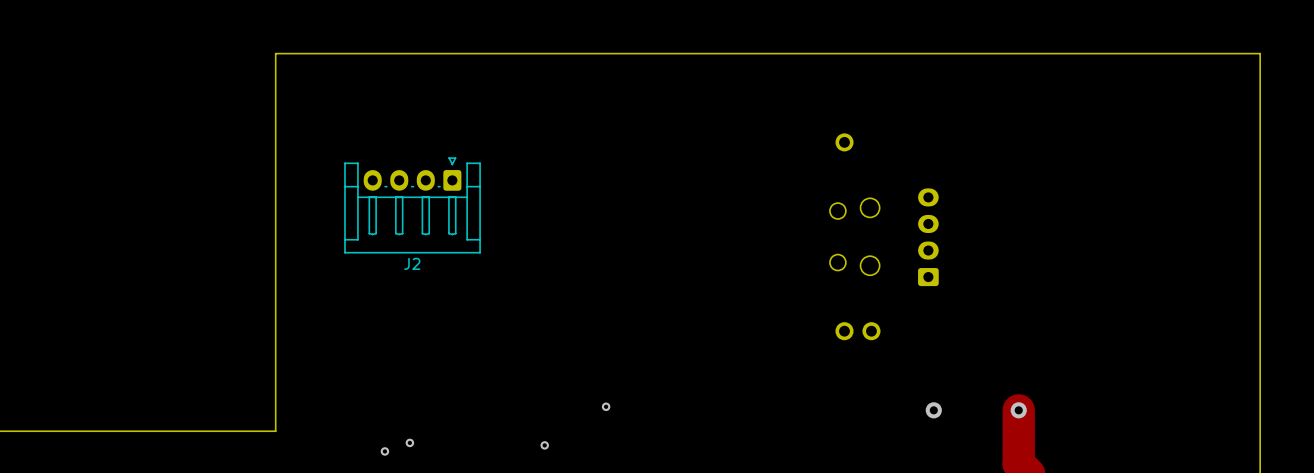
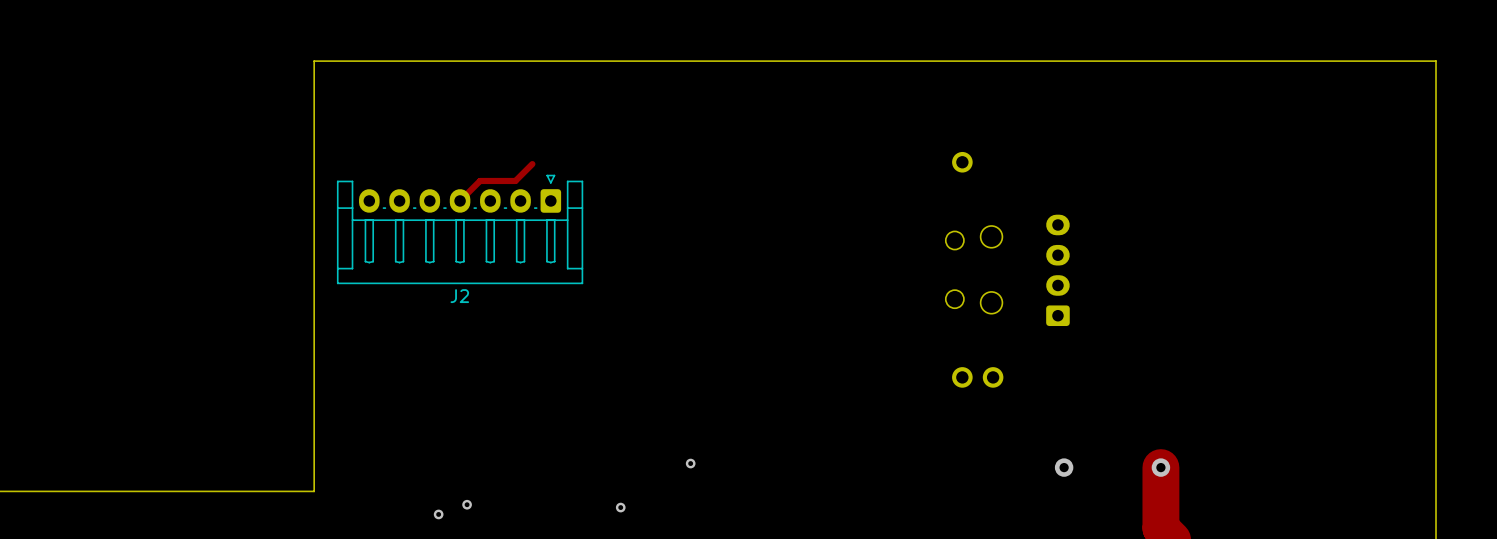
track: none -> (532, 164) (515, 180) (480, 180) (460, 200)
J2 footprint: [344, 157, 481, 254] -> [337, 174, 584, 285]

